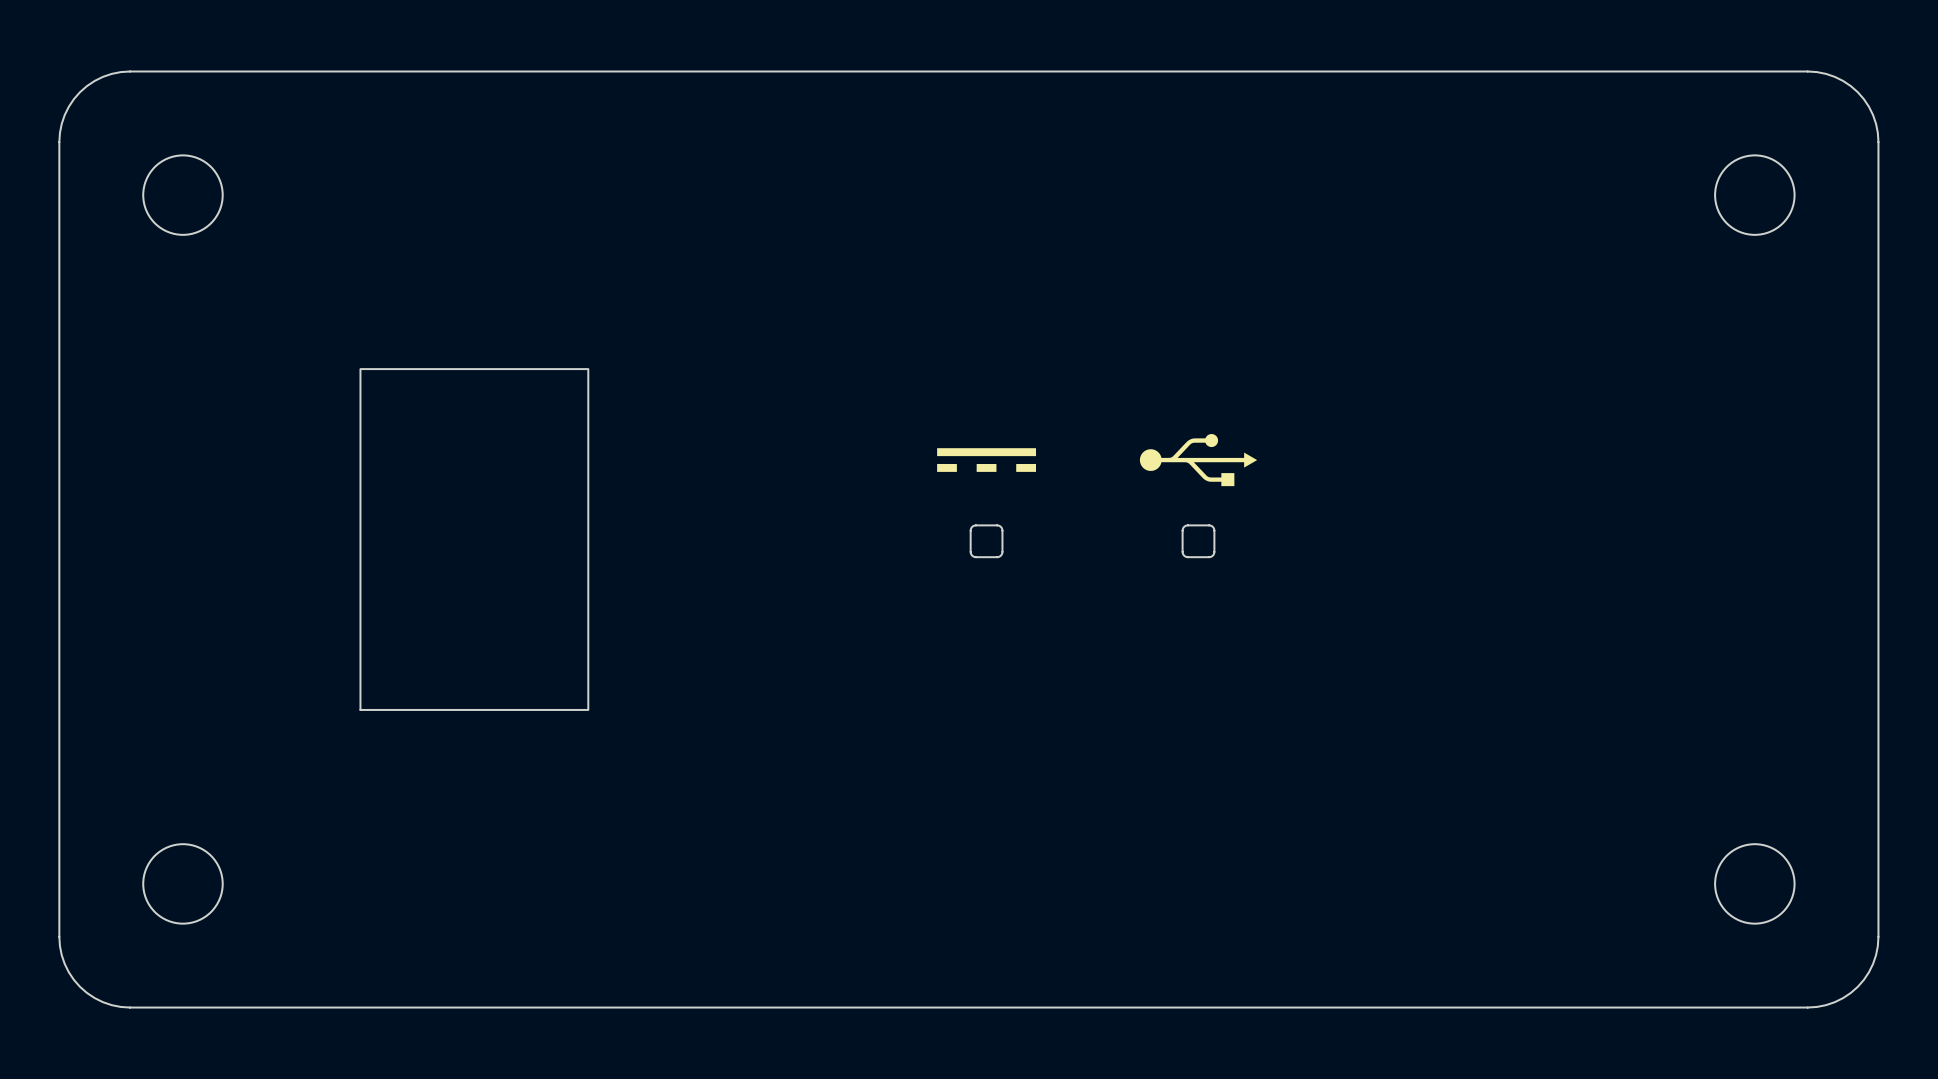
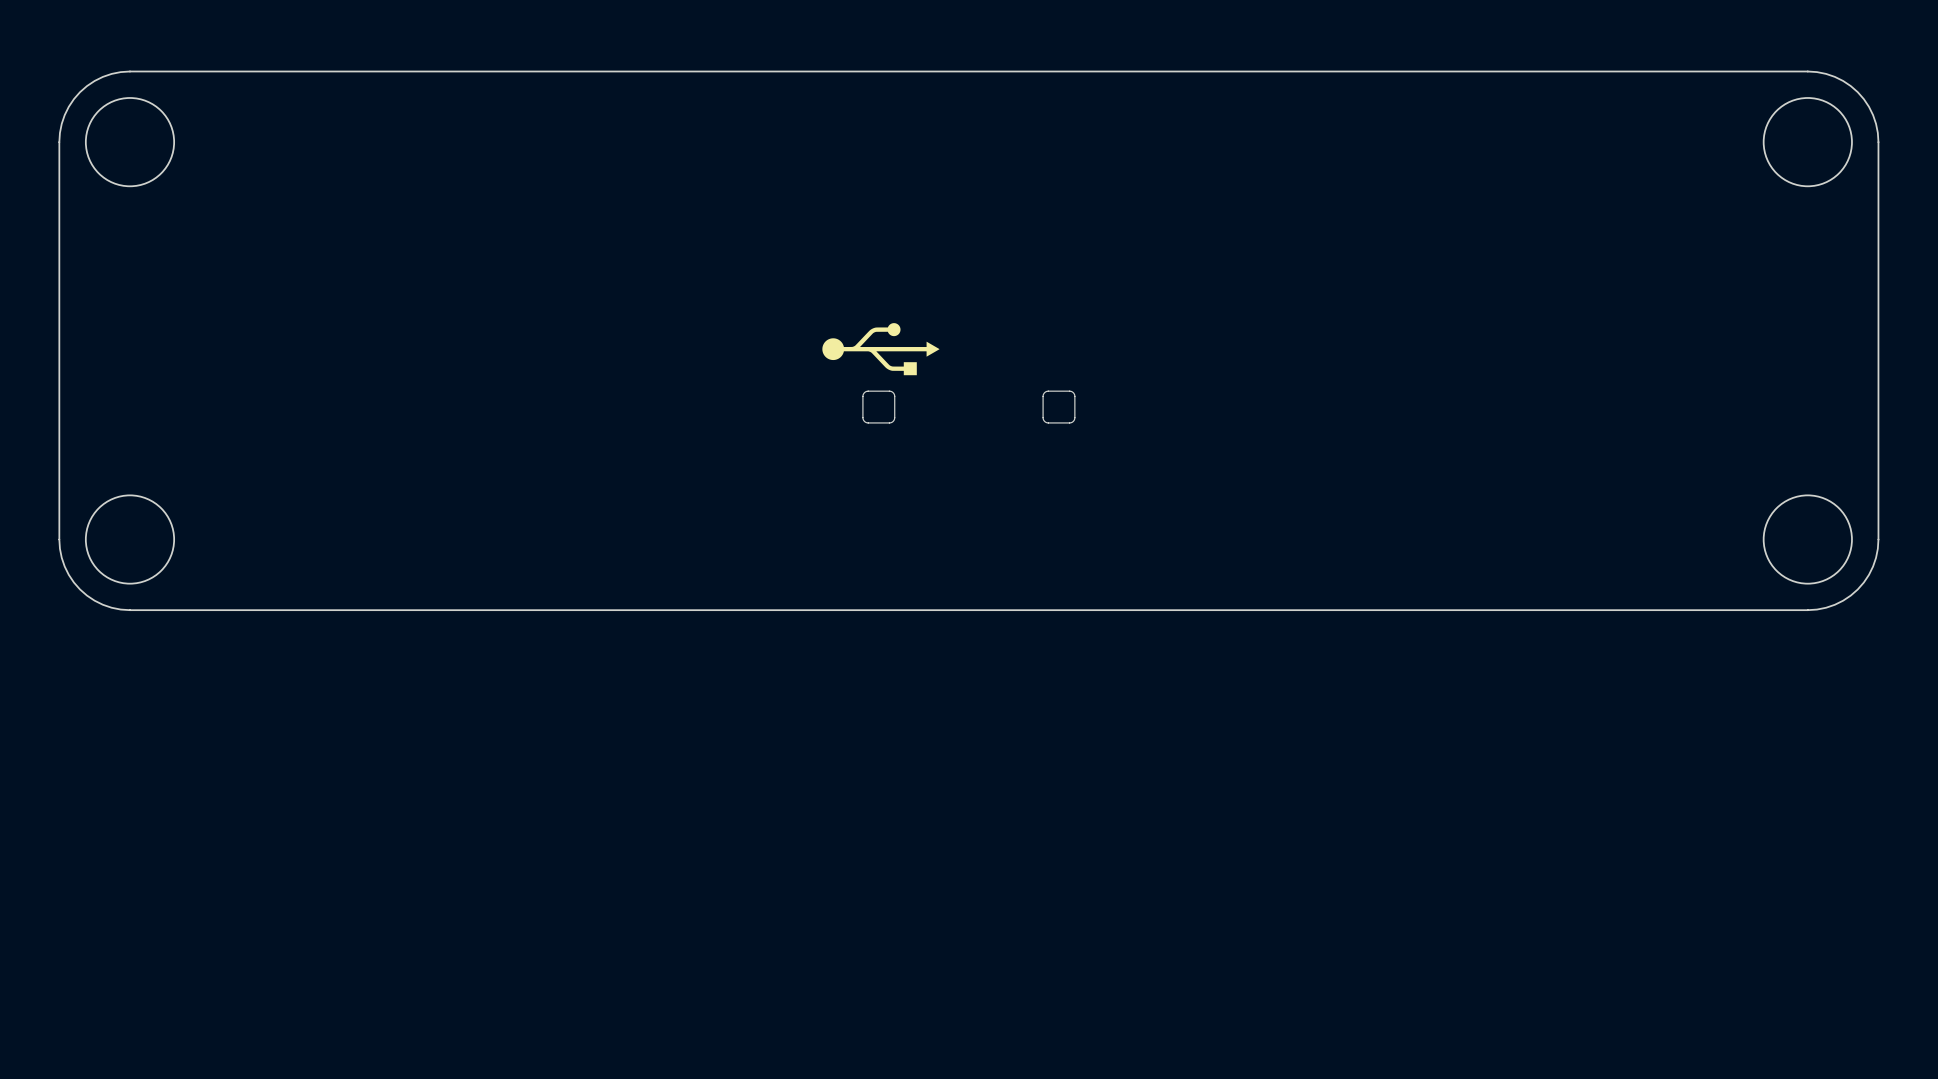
round board edge: none -> [84, 97, 176, 188]
round board edge: none -> [1762, 97, 1853, 188]
round board edge: [142, 154, 224, 236] -> none
round board edge: [1714, 154, 1796, 236] -> none
drawing: [360, 368, 589, 711] -> none
part: none -> (878, 407)
part: none -> (1058, 407)
drawing: [937, 448, 1037, 472] -> none
drawing position: (1198, 460) -> (880, 349)
round board edge: none -> [84, 494, 176, 585]
round board edge: none -> [1762, 494, 1853, 585]
board edge: (59, 539) (59, 946) (64, 963) (80, 986) (102, 1002) (129, 1007) (1807, 1007) (1826, 1005) (1843, 998) (1863, 979) (1873, 963) (1877, 946) (1878, 539) -> (59, 539) (64, 566) (80, 589) (102, 604) (129, 610) (1807, 610) (1834, 604) (1857, 589) (1873, 566) (1878, 539)
part: (986, 541) -> none
part: (1198, 541) -> none
round board edge: [142, 843, 224, 925] -> none
round board edge: [1714, 843, 1796, 925] -> none

